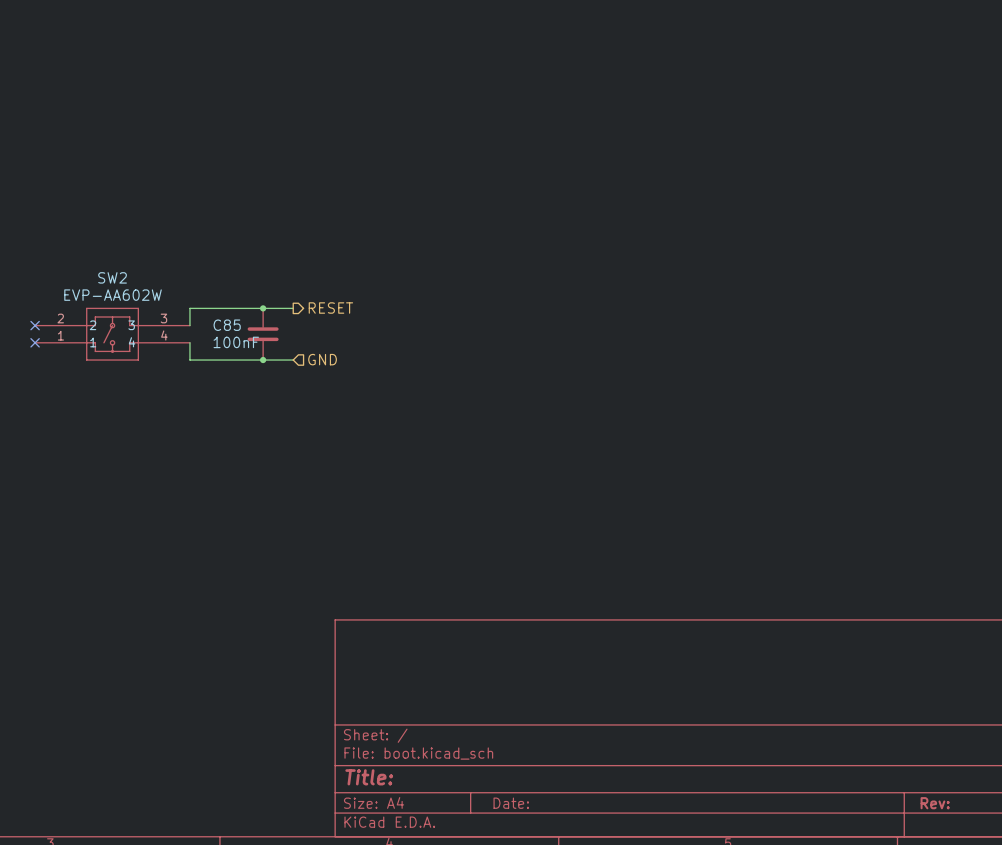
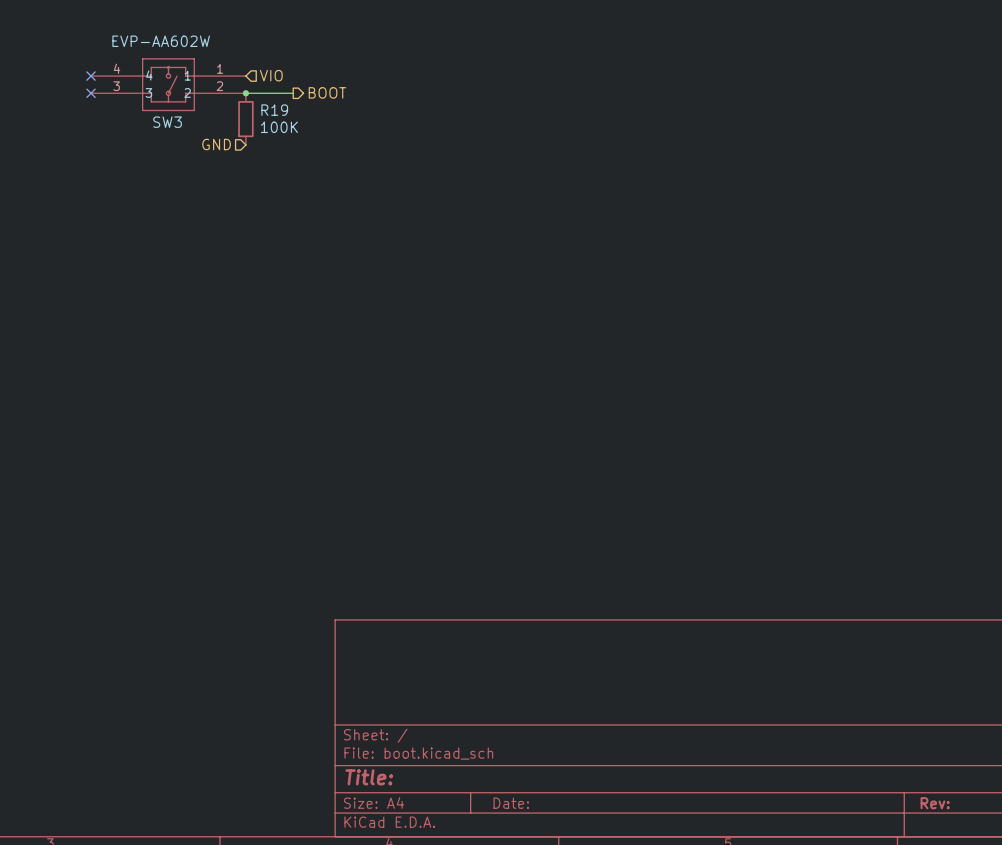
hierarchical label: none -> VIO (271, 75)
no-connect mark: none -> (91, 76)
SW3: none -> EVP-AA602W (168, 84)
hierarchical label: none -> BOOT (327, 92)
no-connect mark: none -> (91, 93)
wire: none -> (245, 93) (293, 93)
junction: none -> (245, 93)
R19: none -> 100K (245, 119)
hierarchical label: none -> GND (216, 144)
junction: (263, 308) -> none
wire: (293, 308) (189, 308) (189, 325) -> none
hierarchical label: RESET (330, 308) -> none
no-connect mark: (35, 325) -> none
SW2: EVP-AA602W (112, 334) -> none
C85: 100nF (263, 334) -> none
no-connect mark: (35, 342) -> none
wire: (189, 342) (189, 360) (293, 360) -> none
hierarchical label: GND (322, 359) -> none
junction: (263, 360) -> none

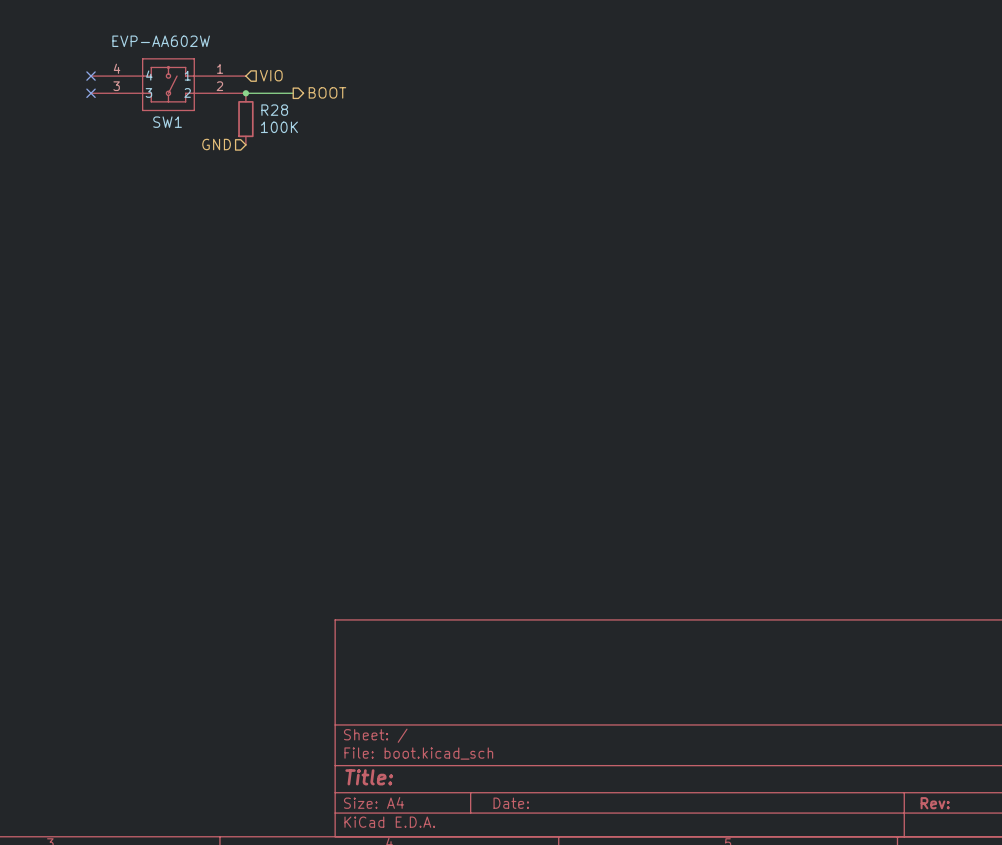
R19 name: R19 (274, 110) -> R28 (274, 110)
SW3 name: SW3 (167, 122) -> SW1 (167, 122)

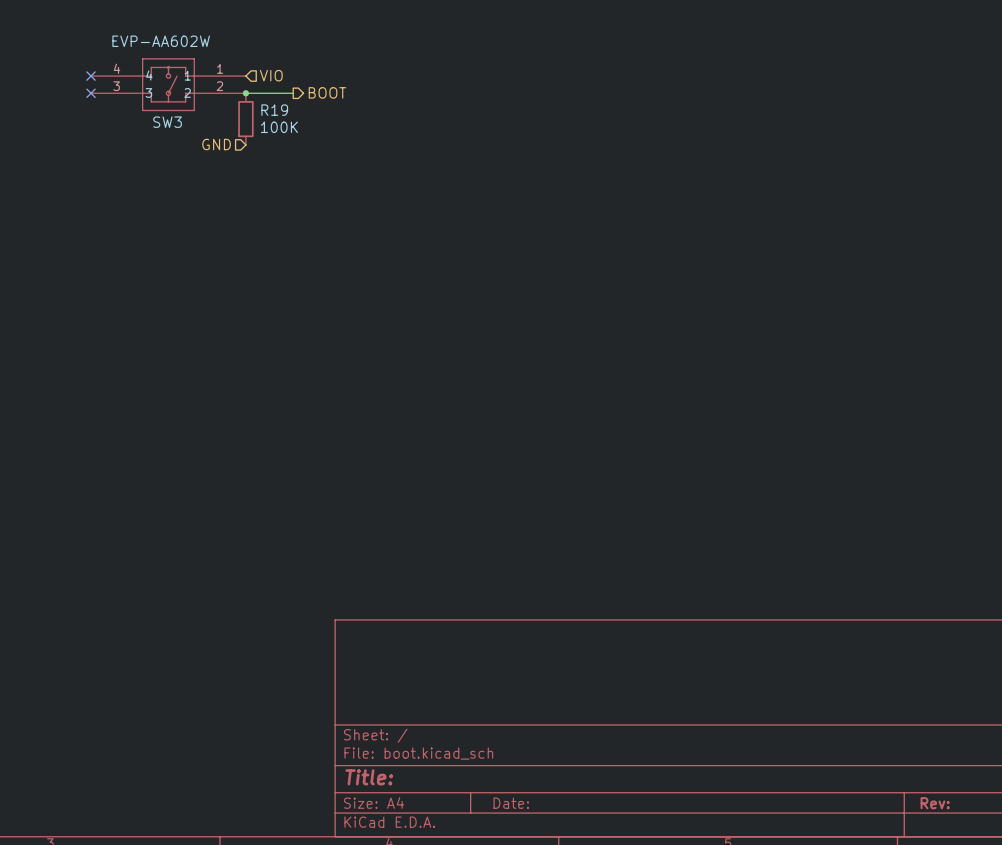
R28 name: R28 (274, 110) -> R19 (274, 110)
SW1 name: SW1 (167, 122) -> SW3 (167, 122)

